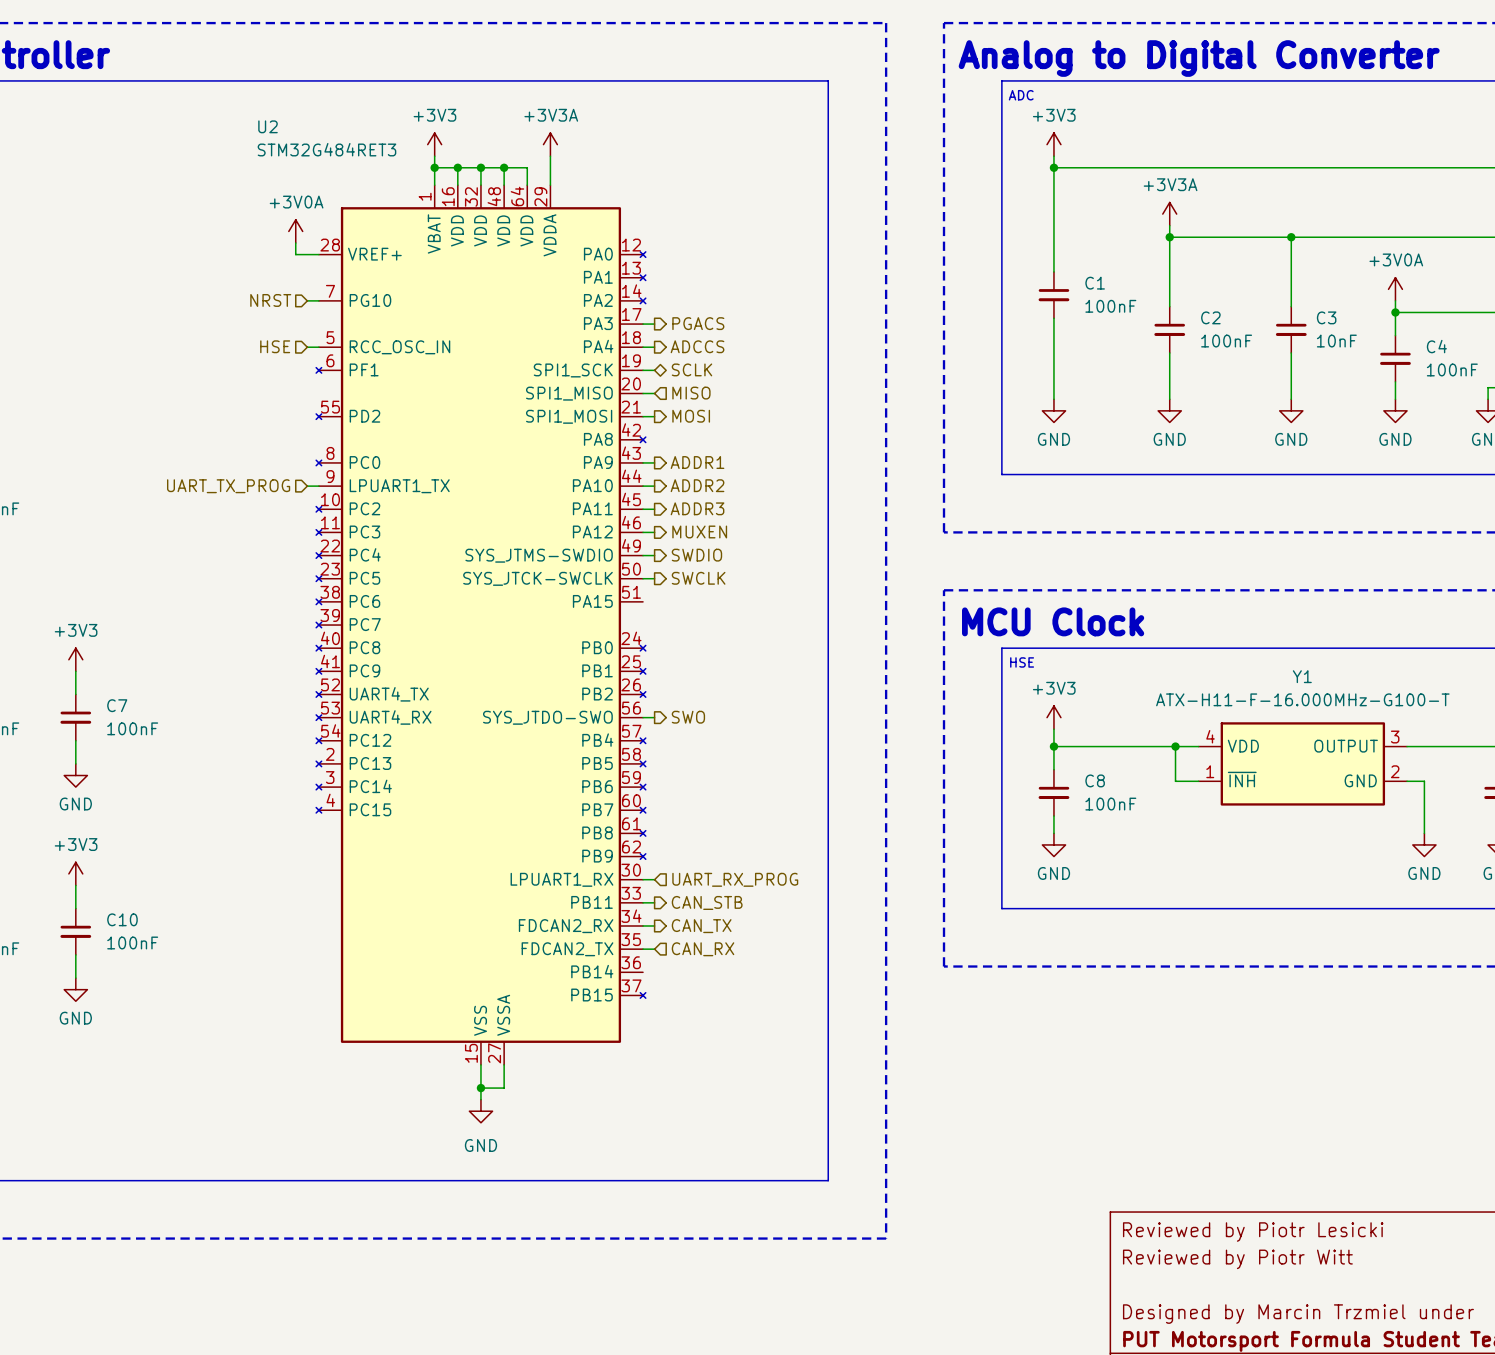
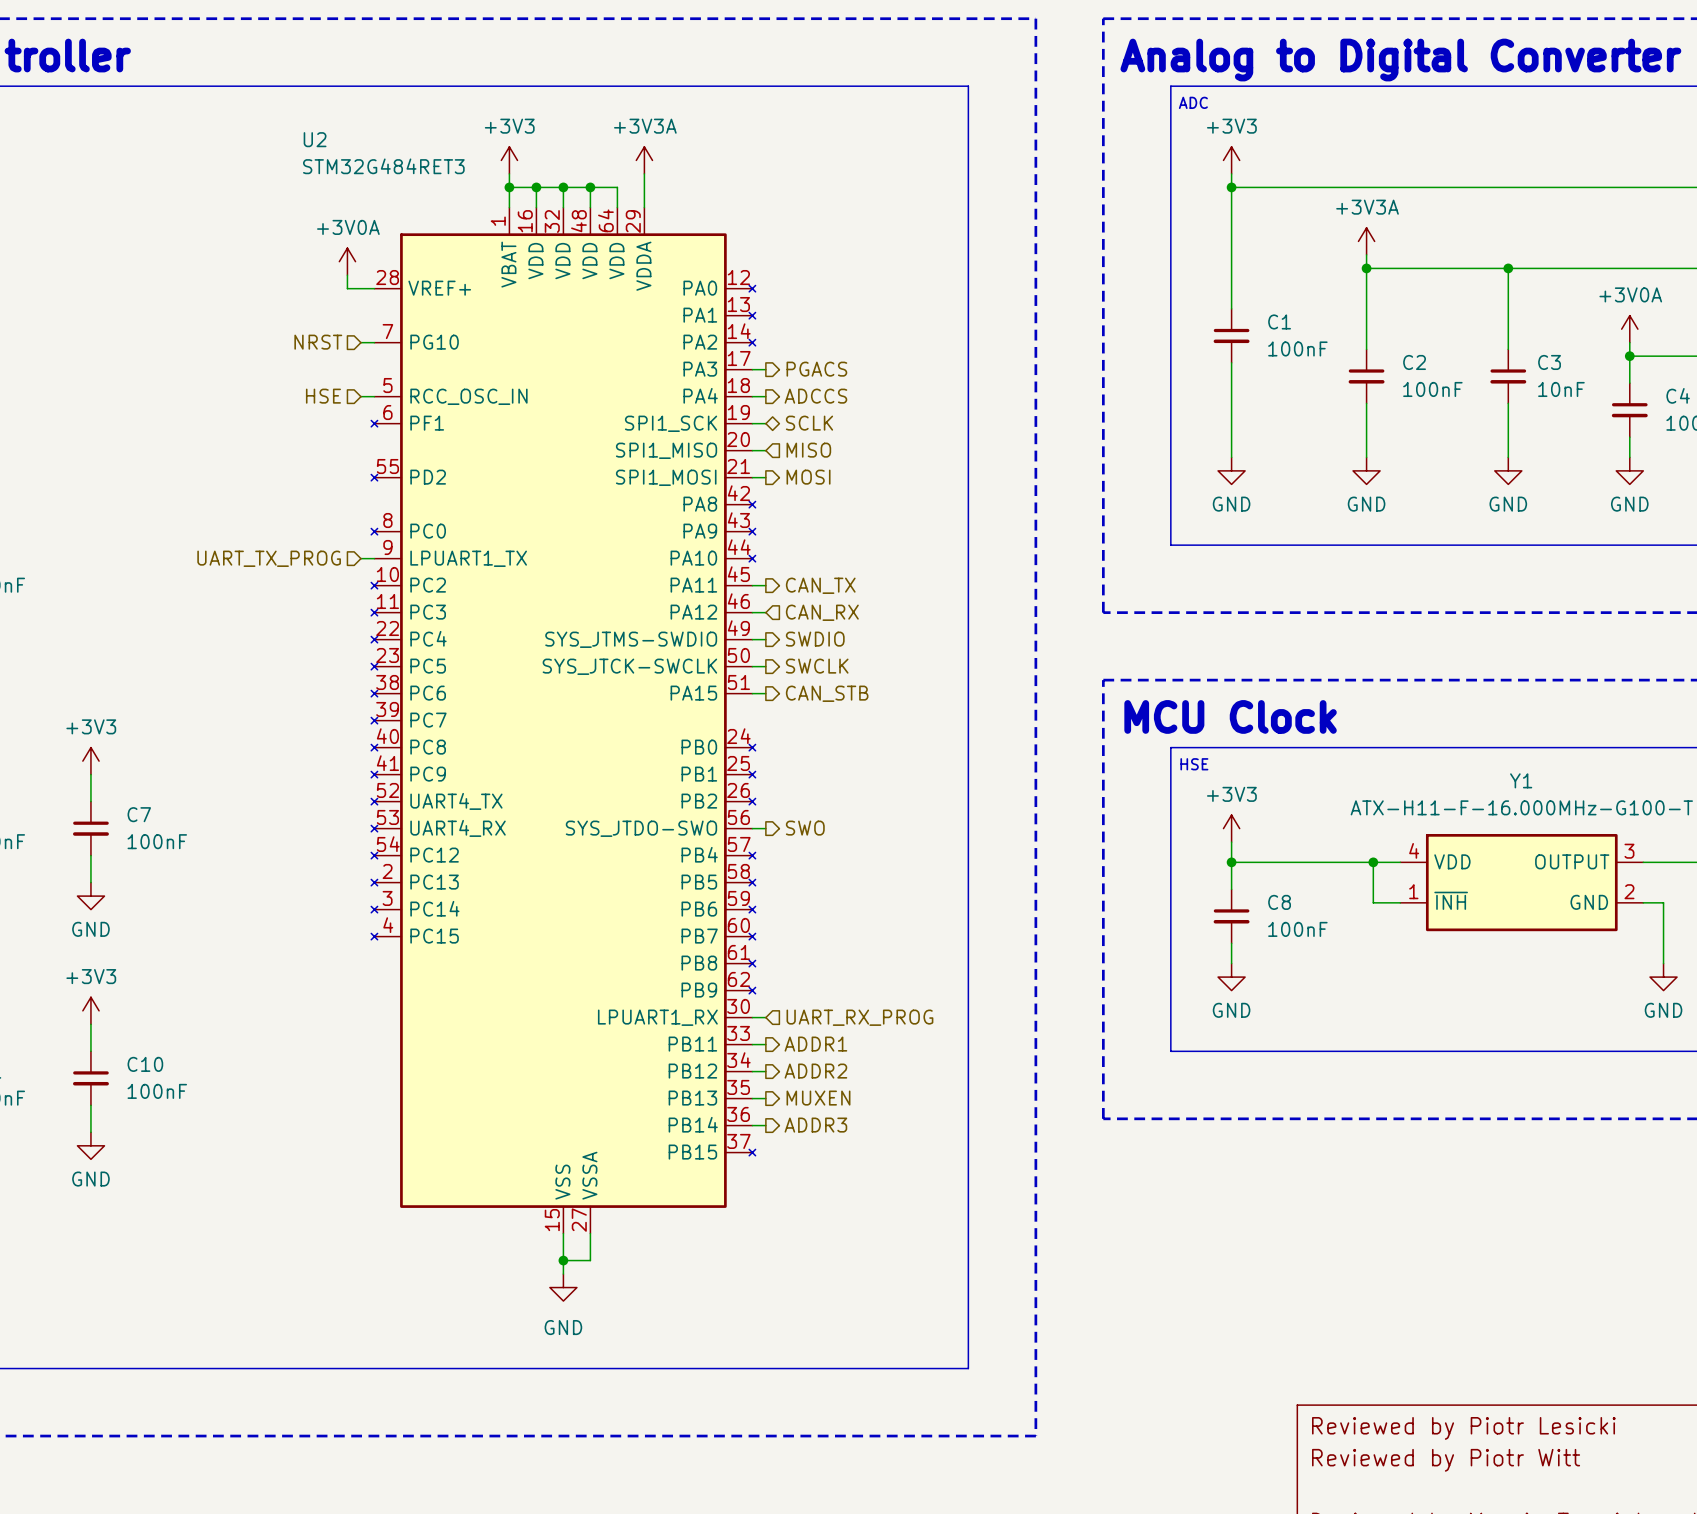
U2 symbol: [316, 185, 646, 1065] -> [371, 207, 756, 1234]
wire: (643, 462) (654, 462) -> none
hierarchical label: ADDR1 (697, 462) -> none
hierarchical label: ADDR2 (697, 485) -> none
wire: (643, 486) (654, 486) -> (752, 693) (765, 693)
hierarchical label: ADDR3 (697, 508) -> CAN_TX (820, 585)
hierarchical label shape: output (699, 531) -> input (822, 612)
hierarchical label: MUXEN (699, 531) -> CAN_RX (822, 612)
hierarchical label: none -> CAN_STB (827, 693)
hierarchical label: CAN_STB (707, 902) -> ADDR1 (815, 1044)
hierarchical label: CAN_TX (701, 926) -> ADDR2 (815, 1071)
hierarchical label shape: input (703, 949) -> output (818, 1098)
hierarchical label: CAN_RX (703, 949) -> MUXEN (818, 1098)
hierarchical label: none -> ADDR3 (815, 1125)
wire: none -> (752, 1125) (765, 1125)

